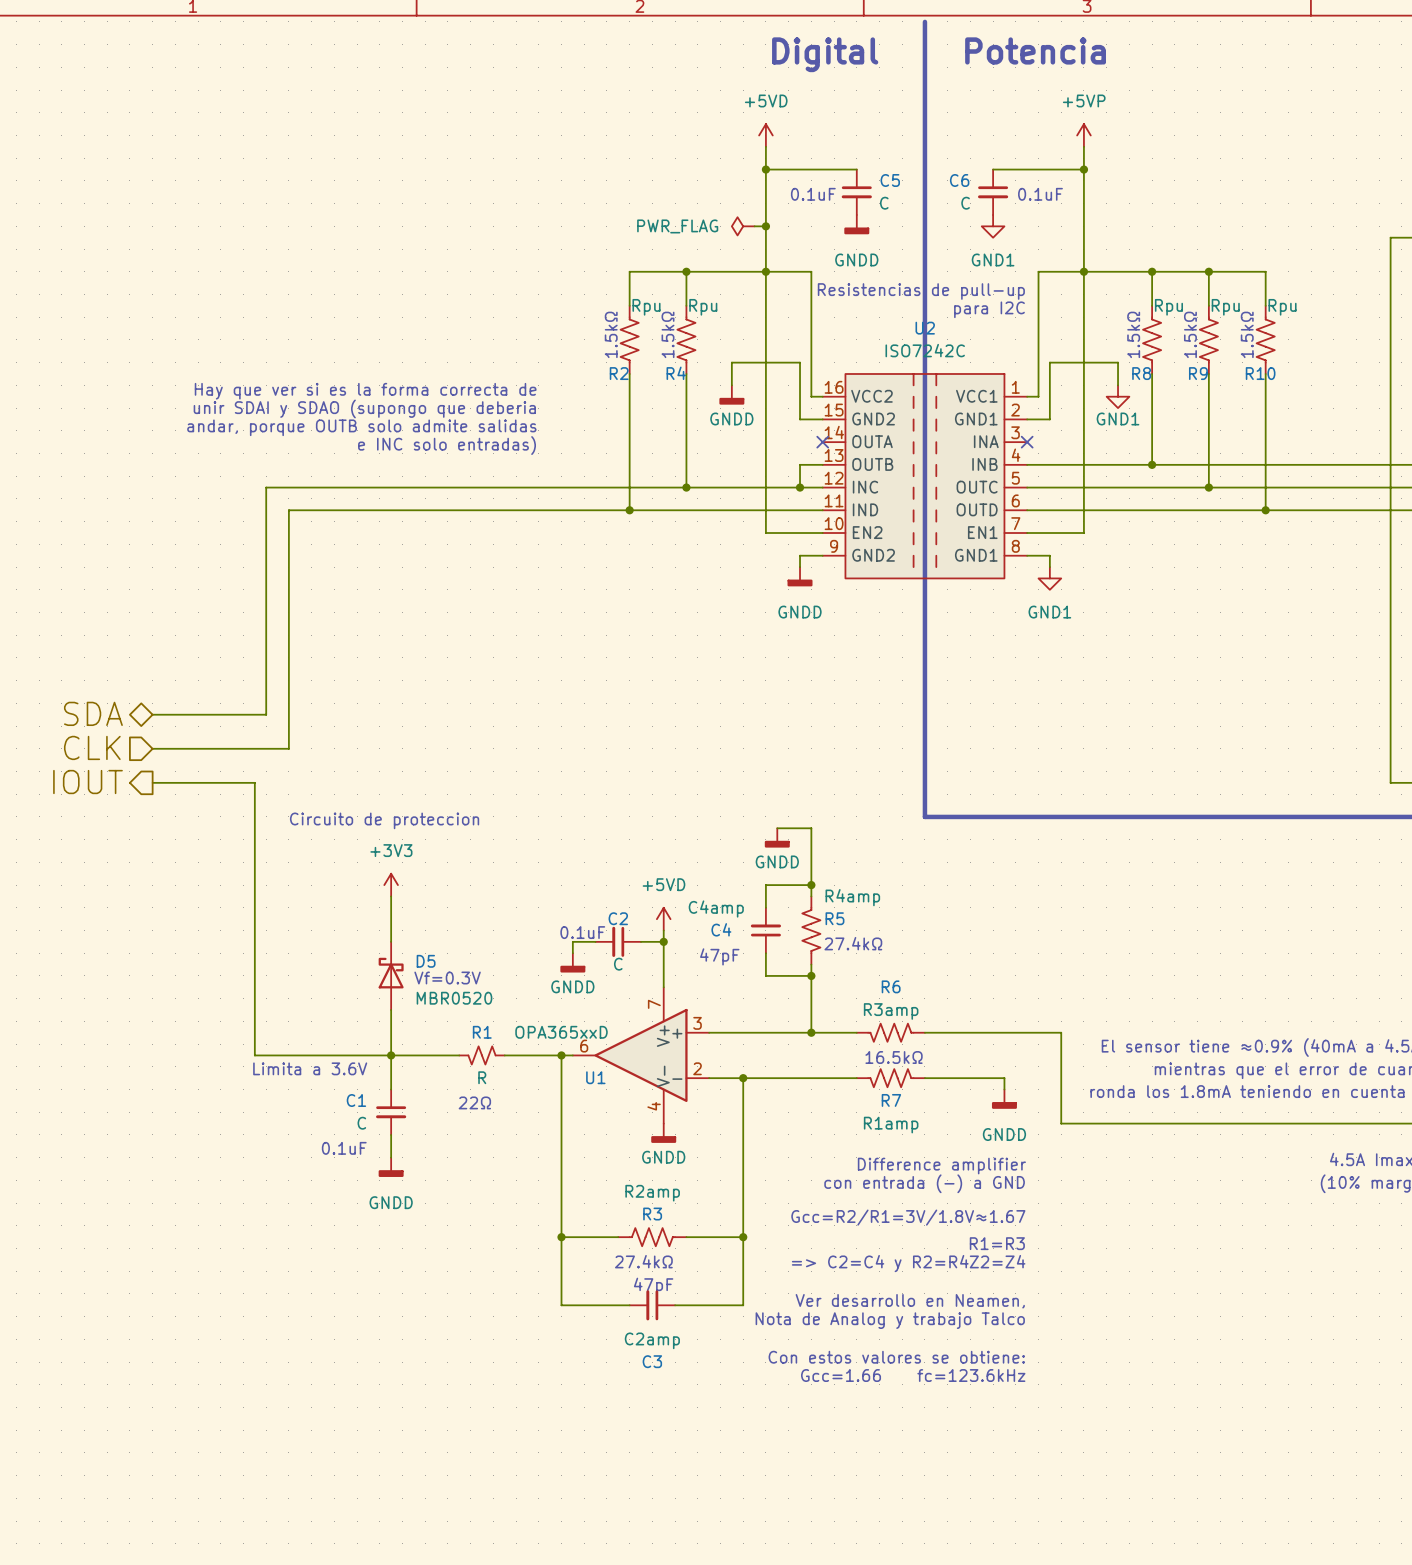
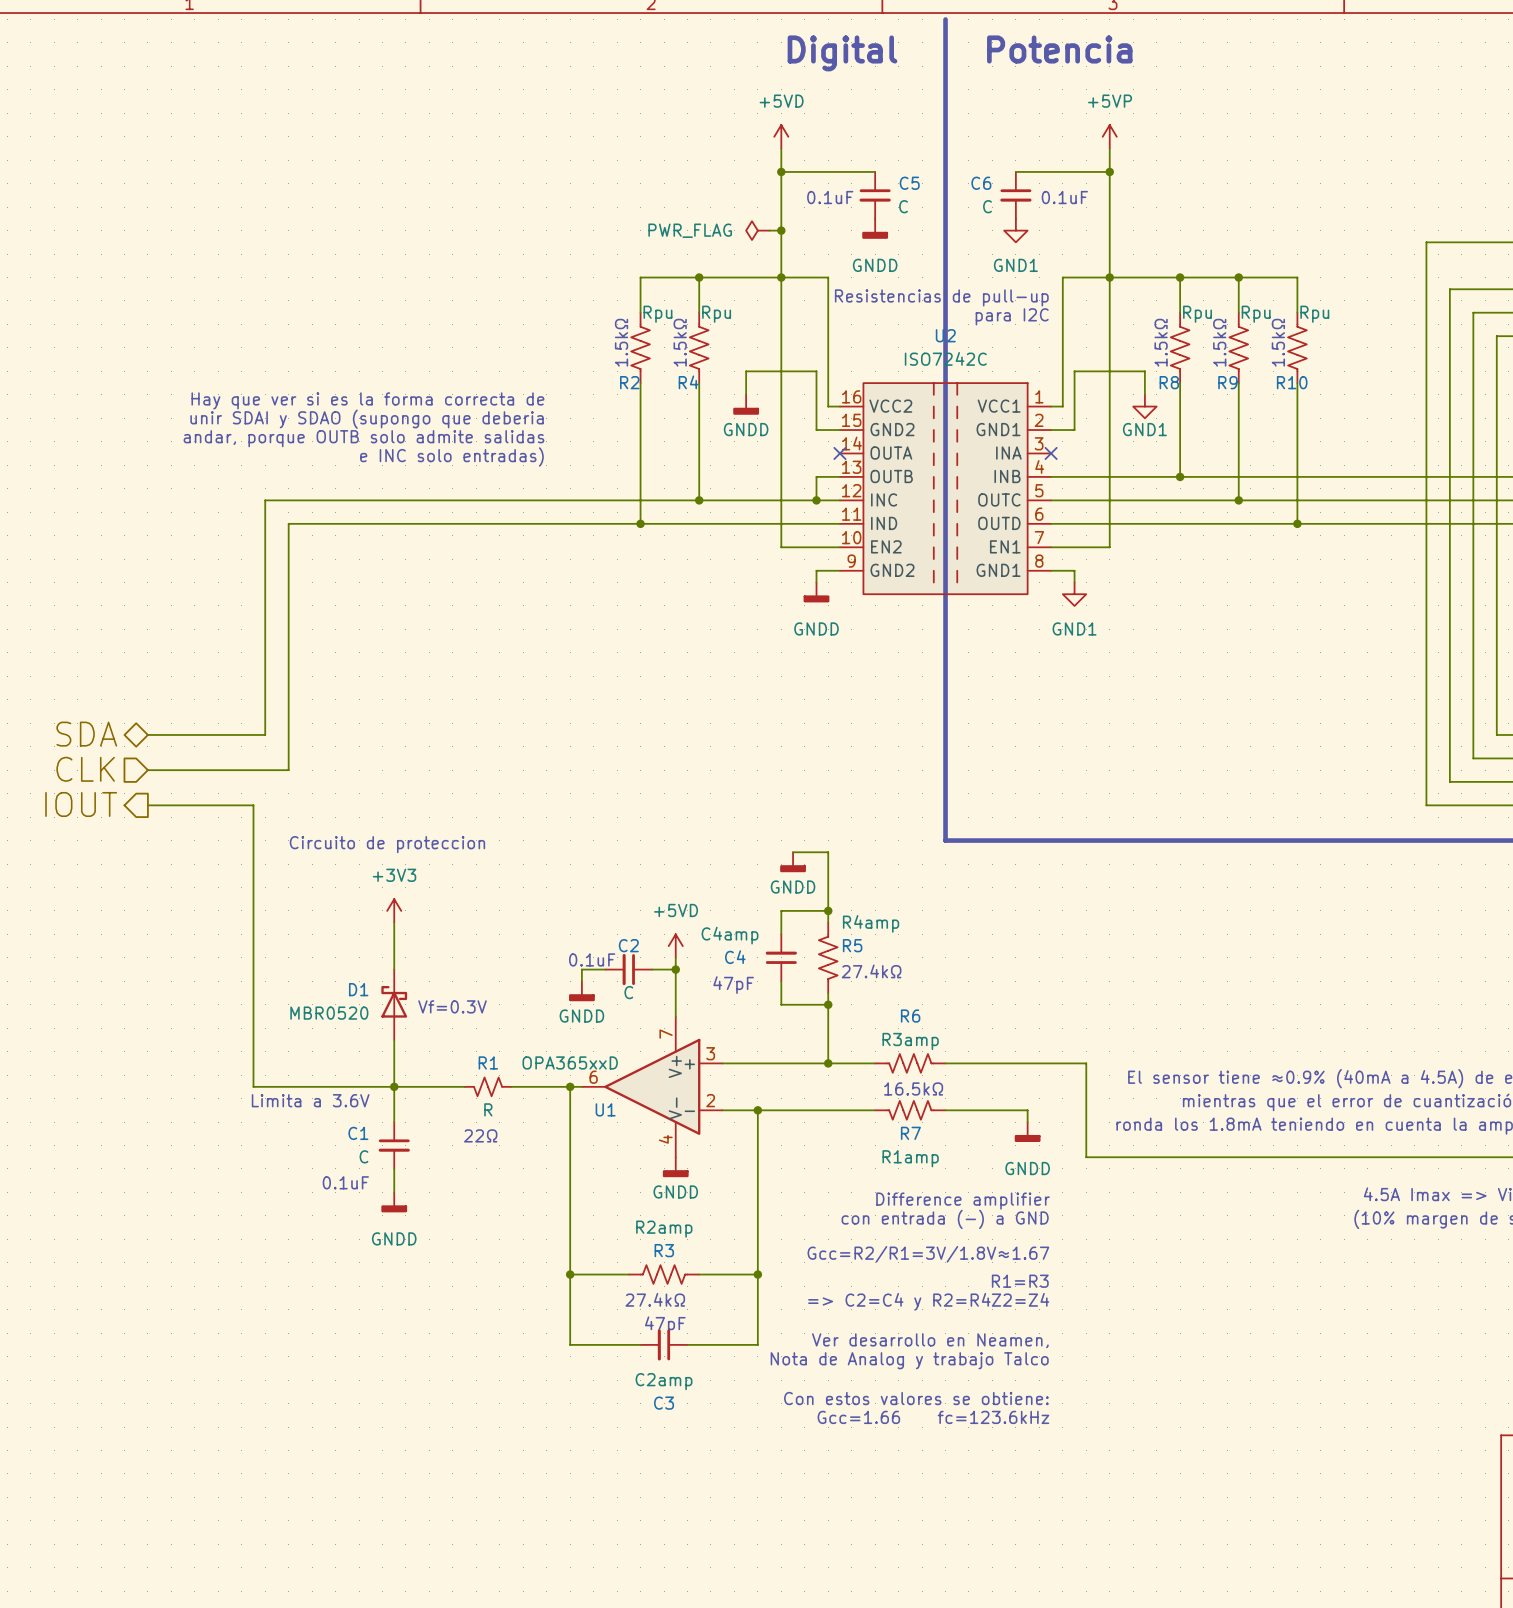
D5 name: D5 (426, 961) -> D1 (358, 989)
D5 value position: MBR0520 (454, 998) -> MBR0520 (329, 1013)

